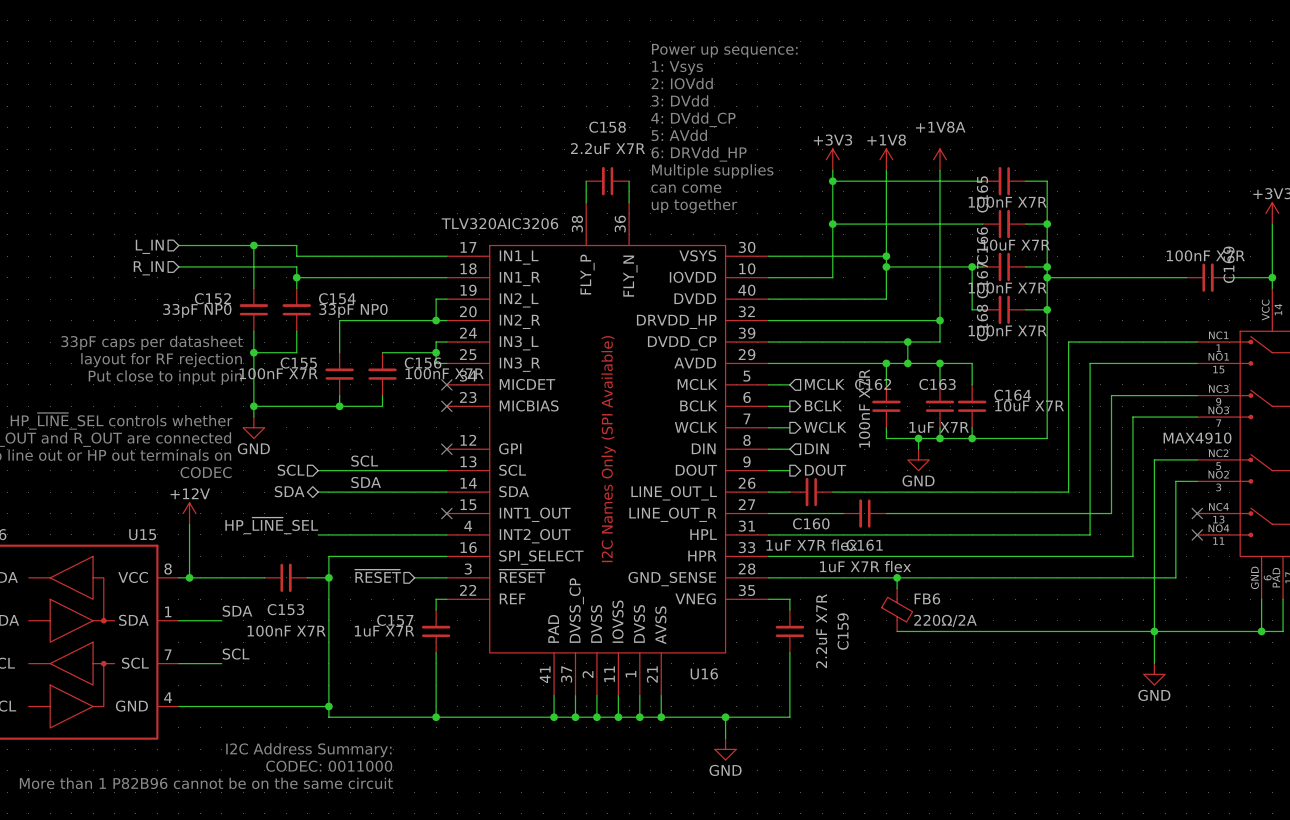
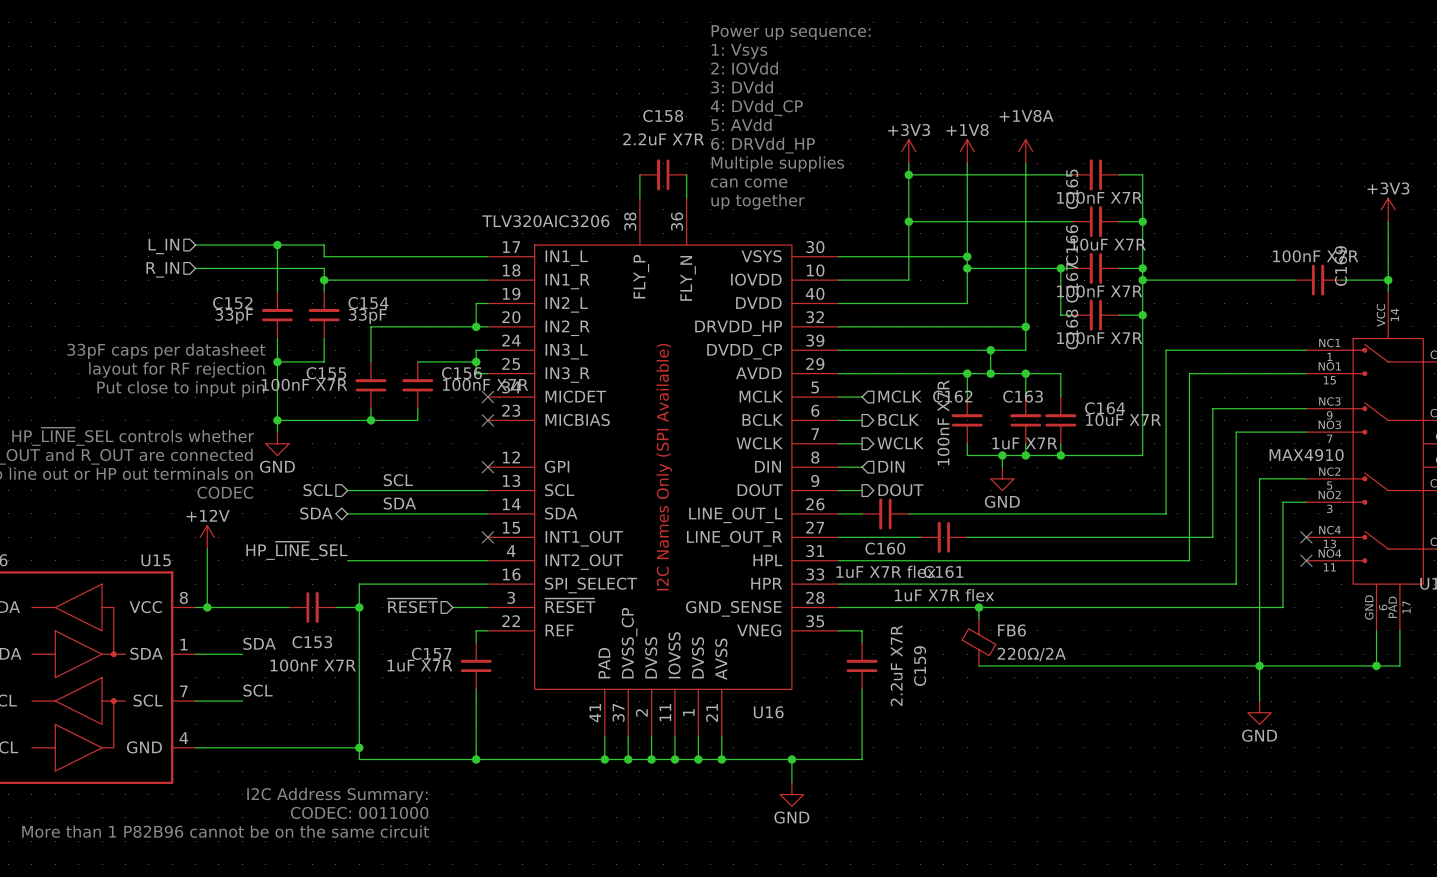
C152 value: 33pF NP0 (197, 310) -> 33pF (234, 316)
C154 value: 33pF NP0 (353, 310) -> 33pF (367, 316)

